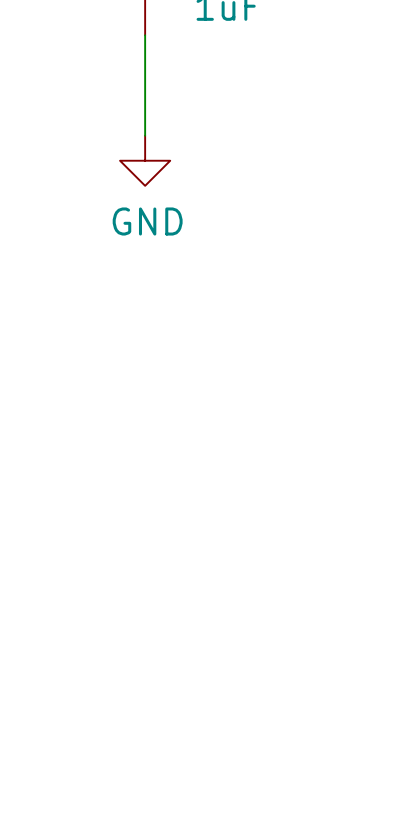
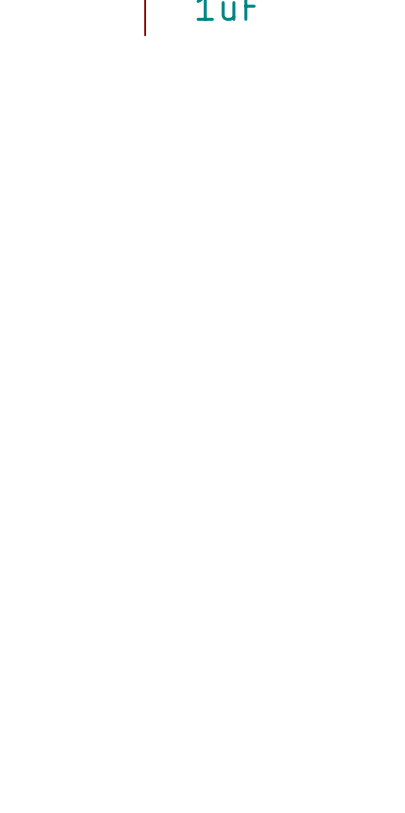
wire: (145, 35) (145, 135) -> none
power symbol: GND (145, 160) -> none

